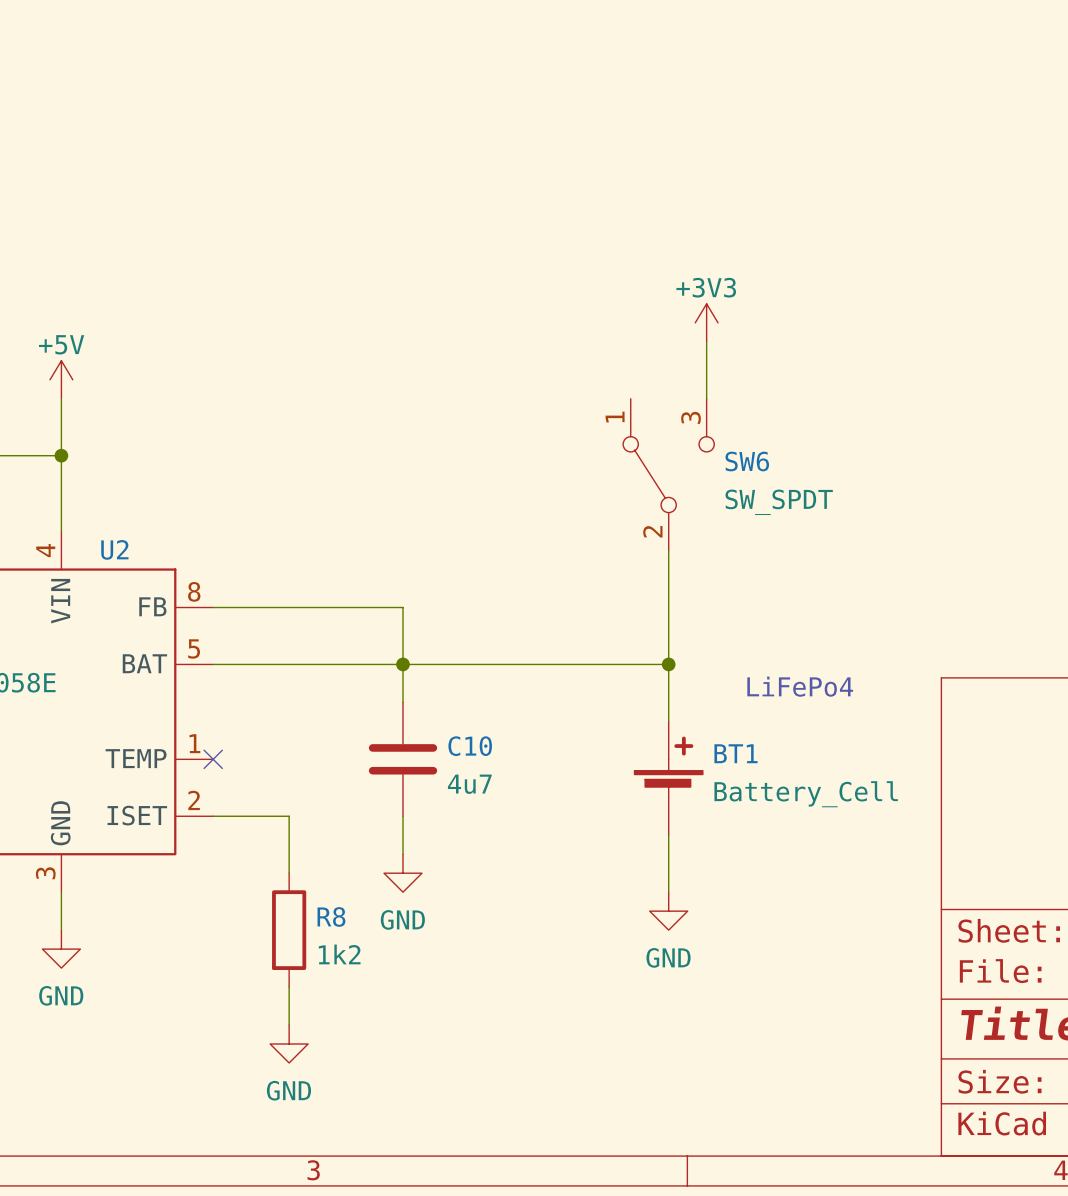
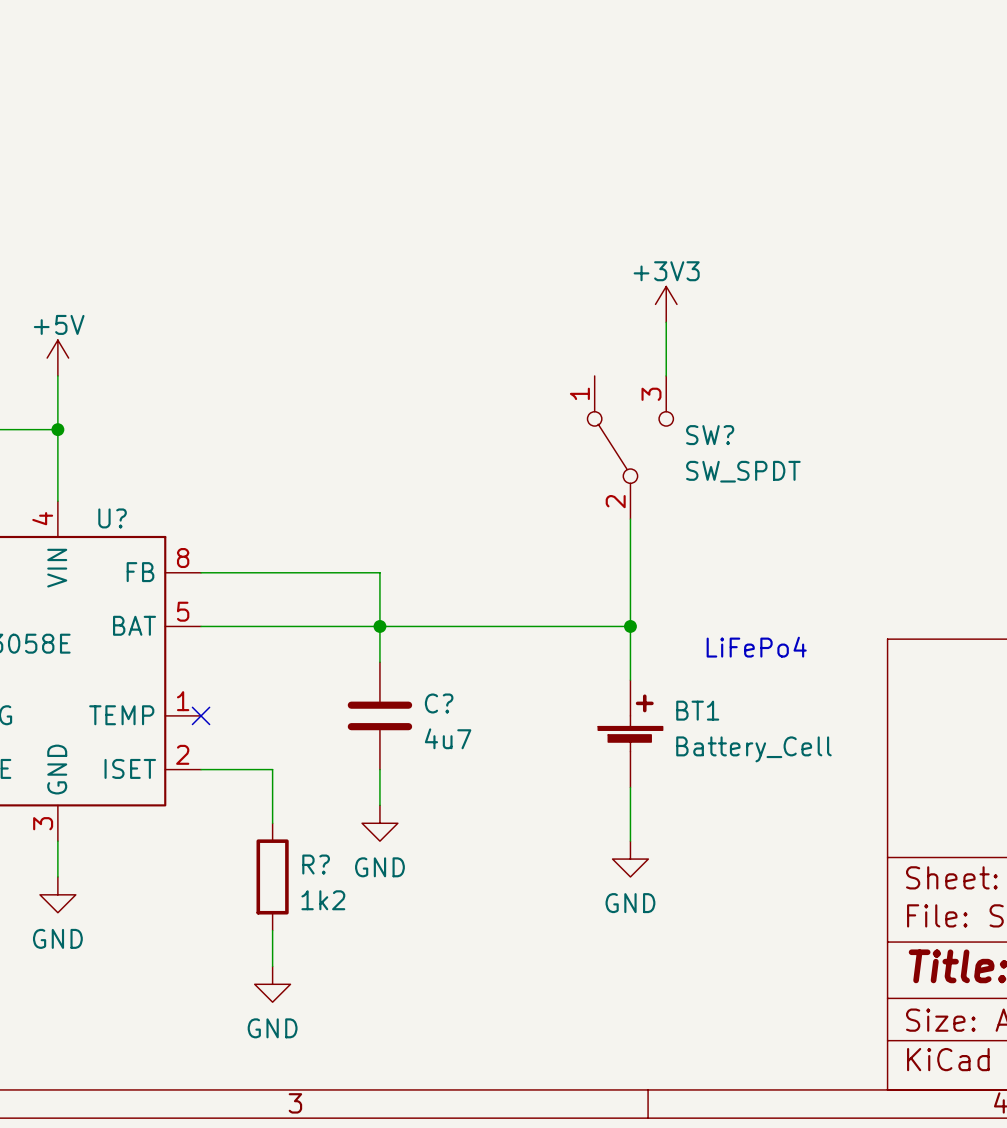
SW6 name: SW6 (747, 461) -> SW? (710, 435)
U2 name: U2 (114, 549) -> U? (112, 518)
C10 name: C10 (470, 746) -> C? (439, 703)
R8 name: R8 (331, 916) -> R? (316, 864)

